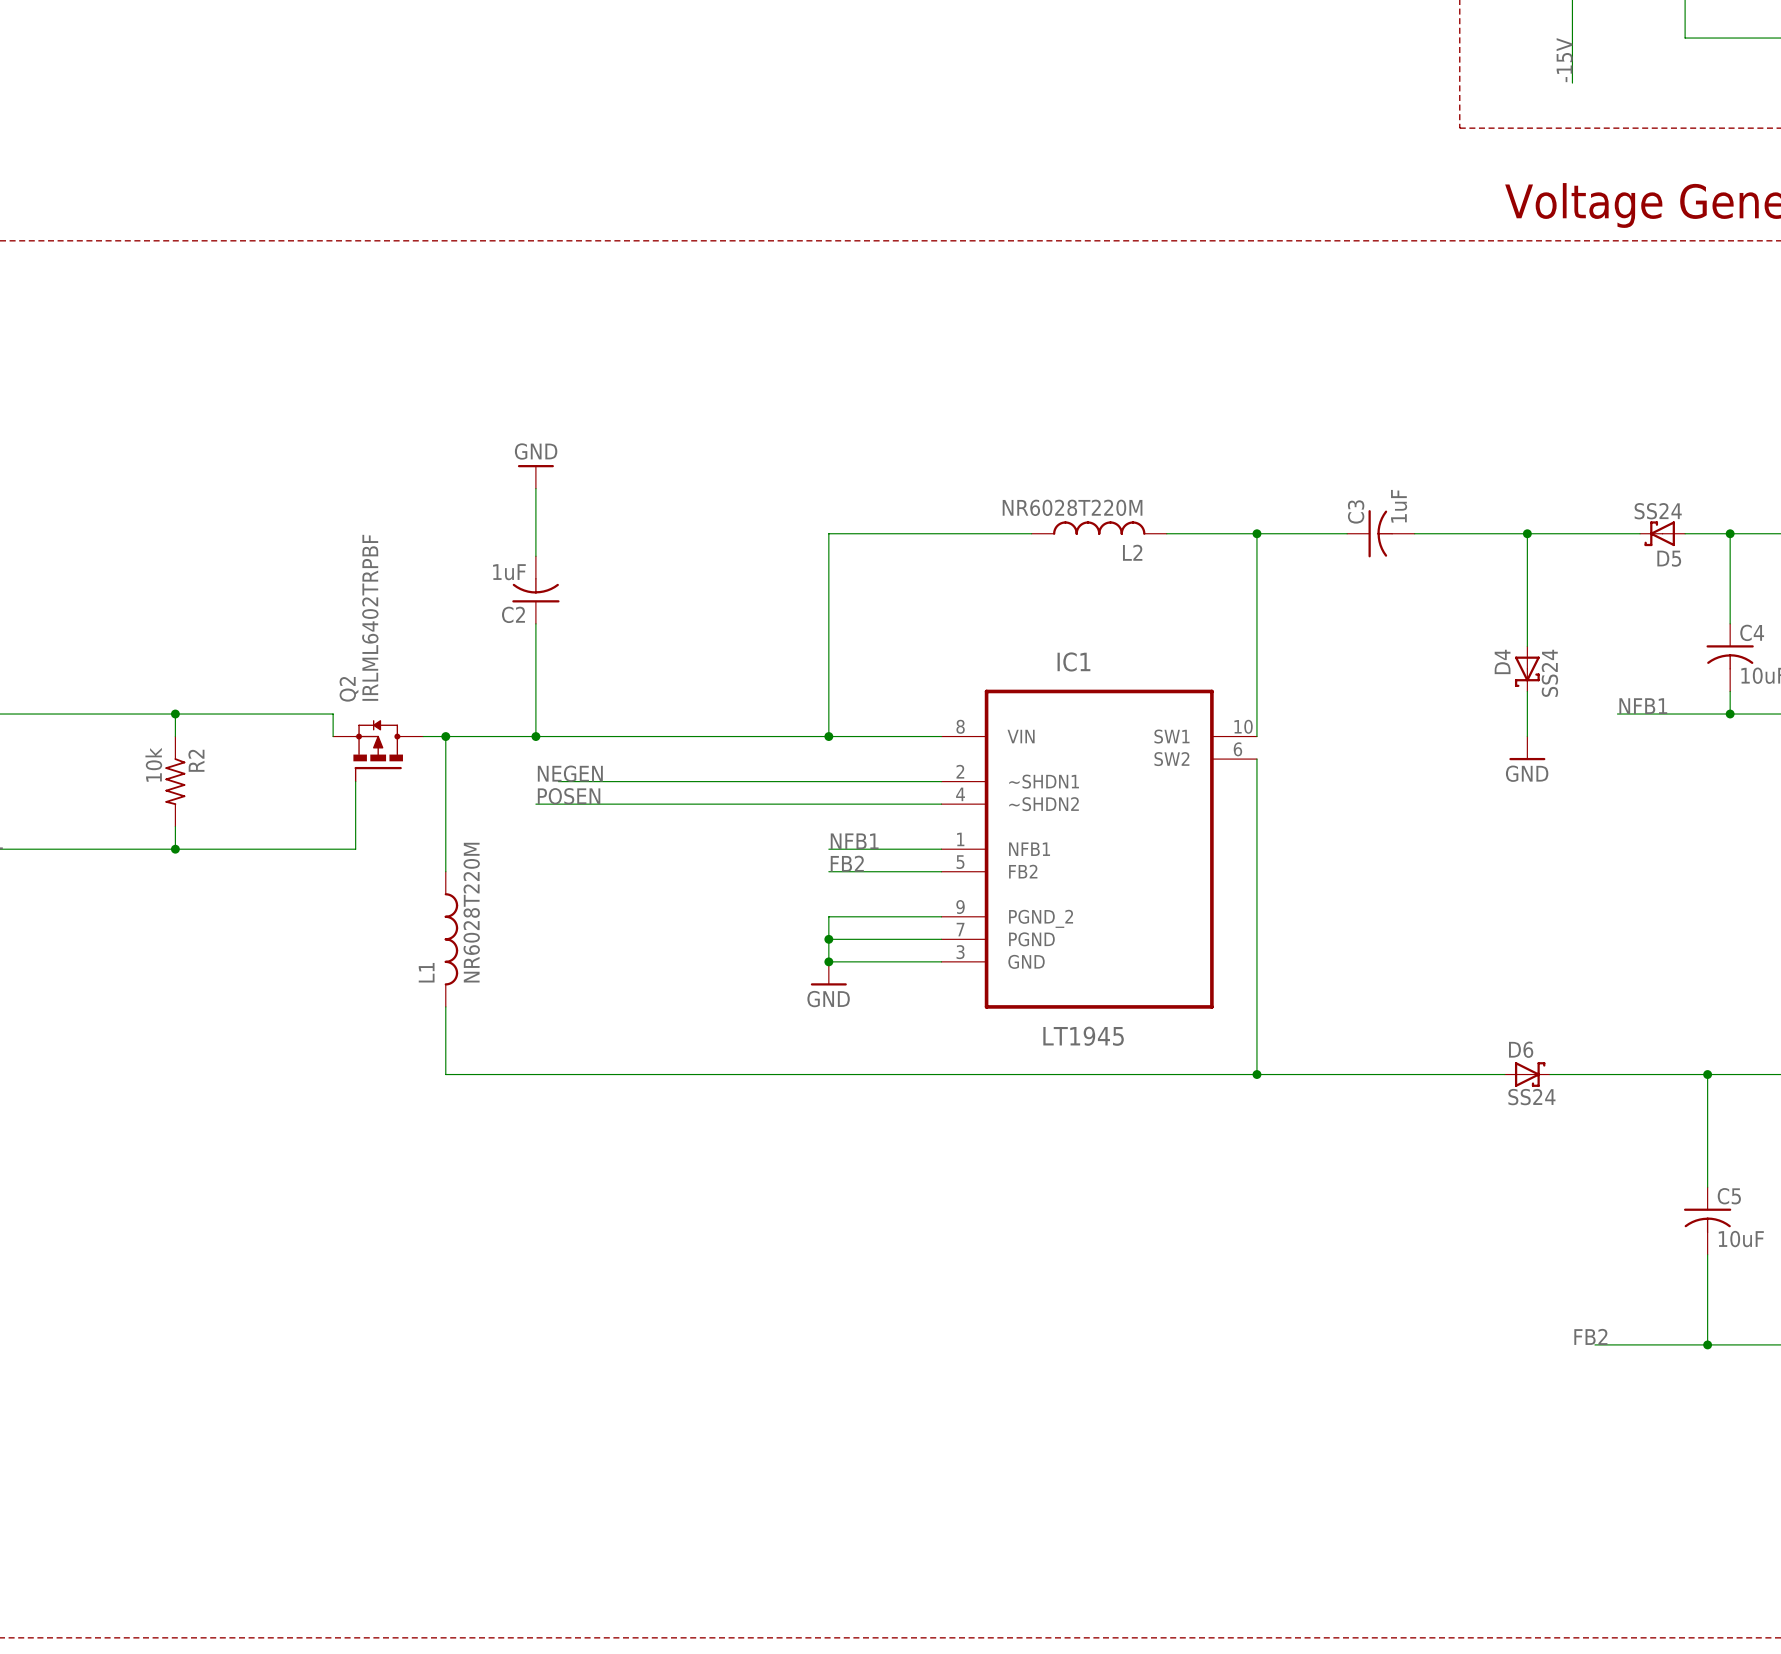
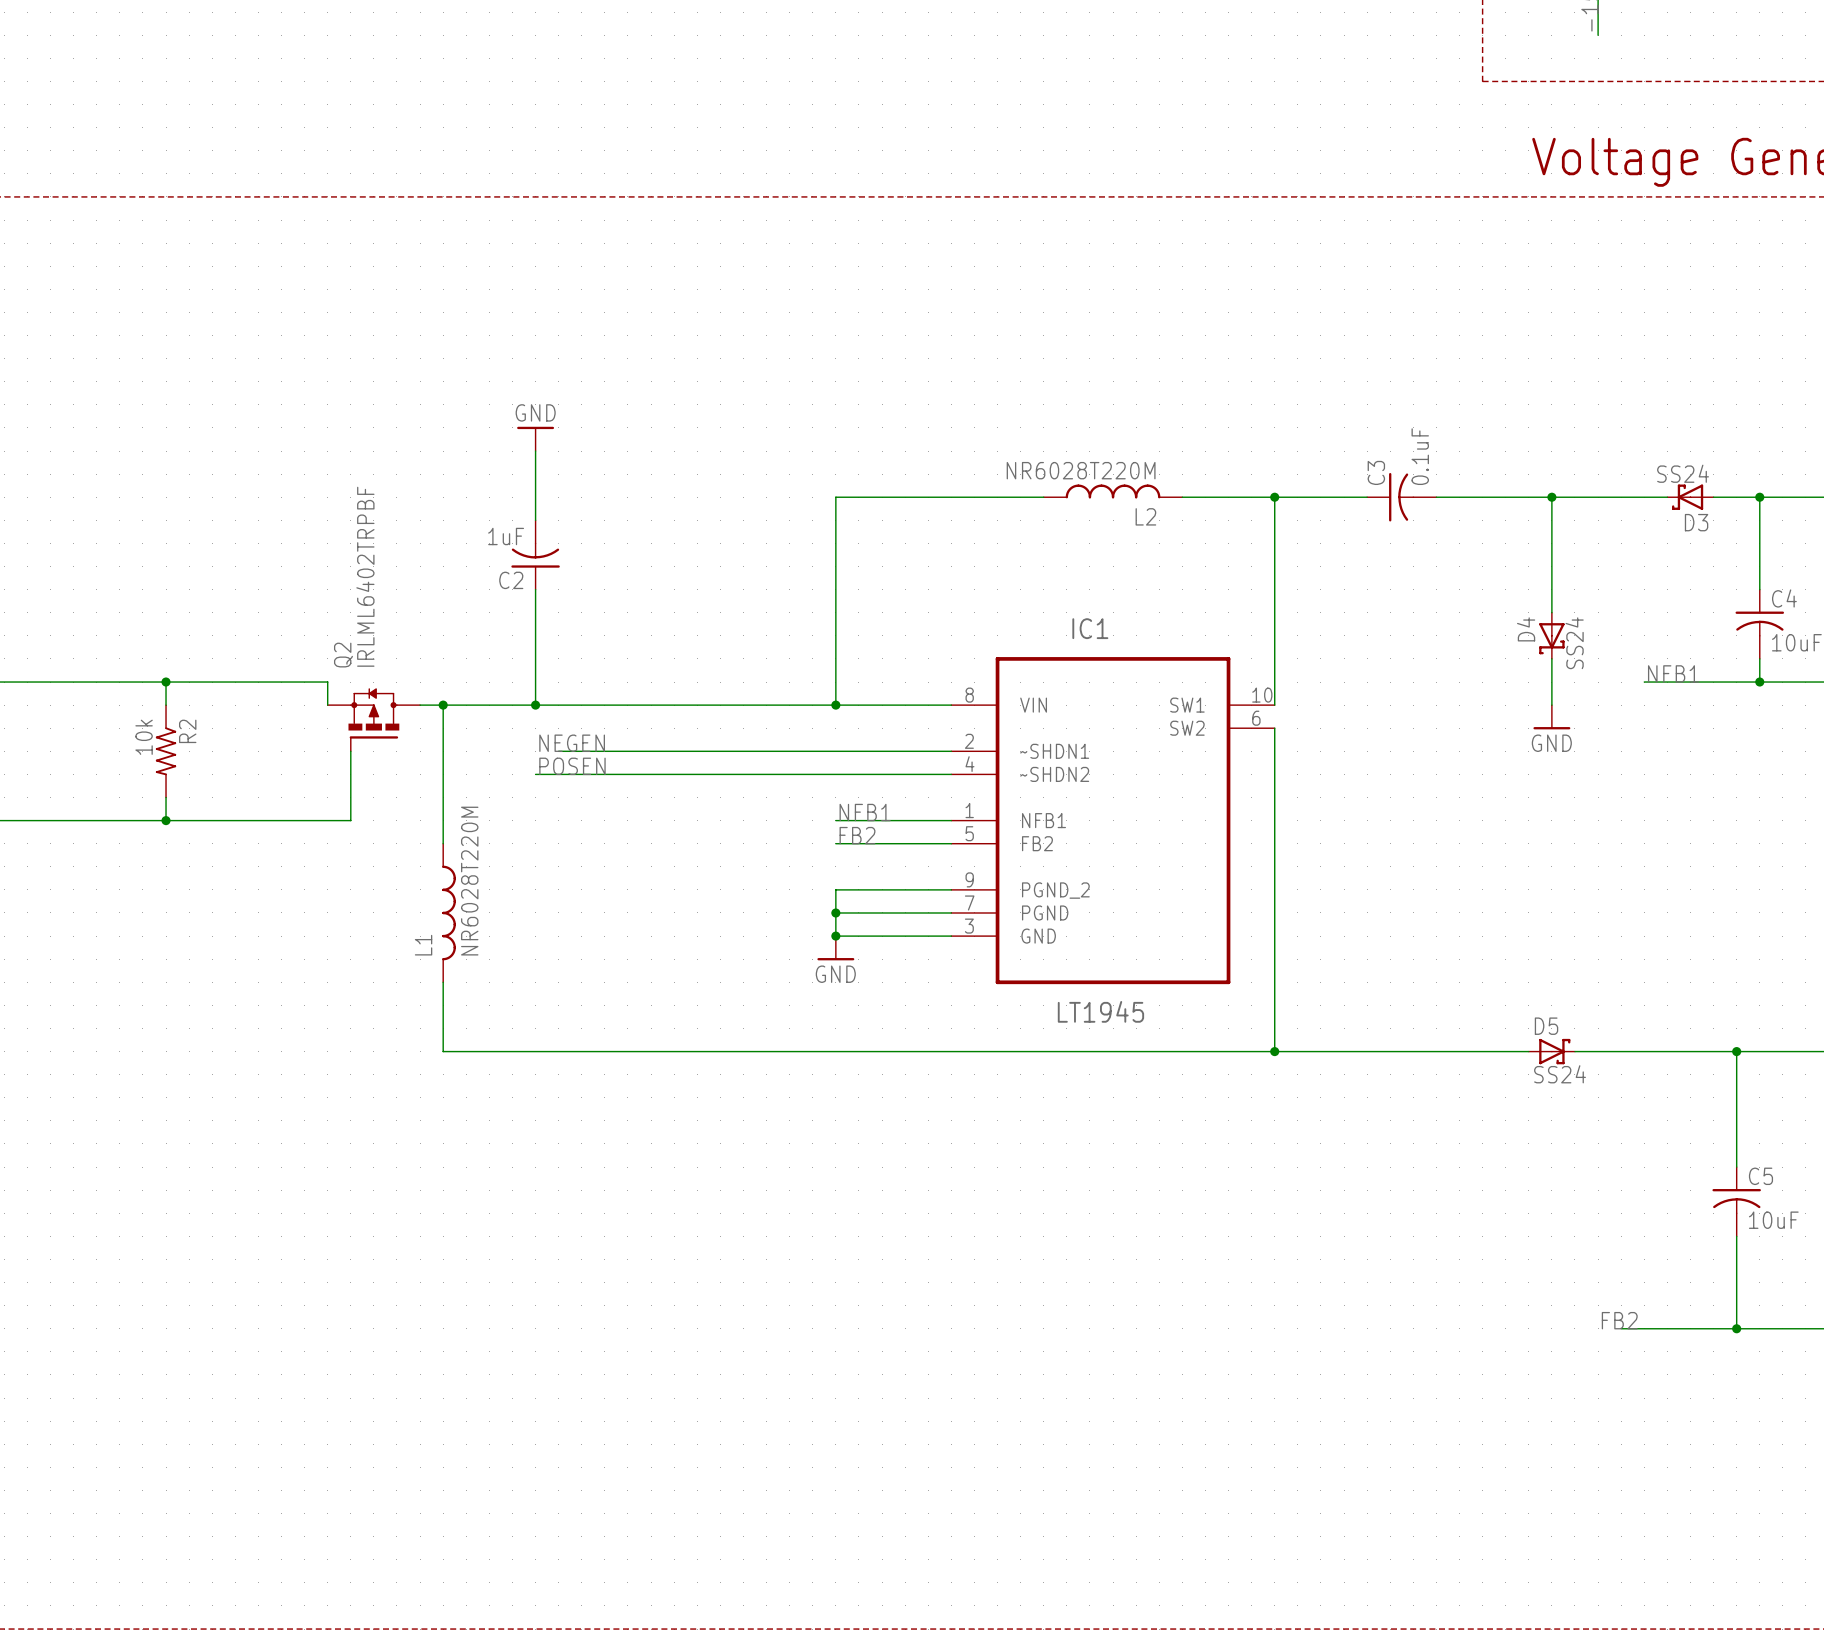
C3 value: 1uF (1399, 506) -> 0.1uF (1420, 456)
D5 name: D5 (1669, 558) -> D3 (1696, 522)
D6 name: D6 (1521, 1049) -> D5 (1546, 1026)

